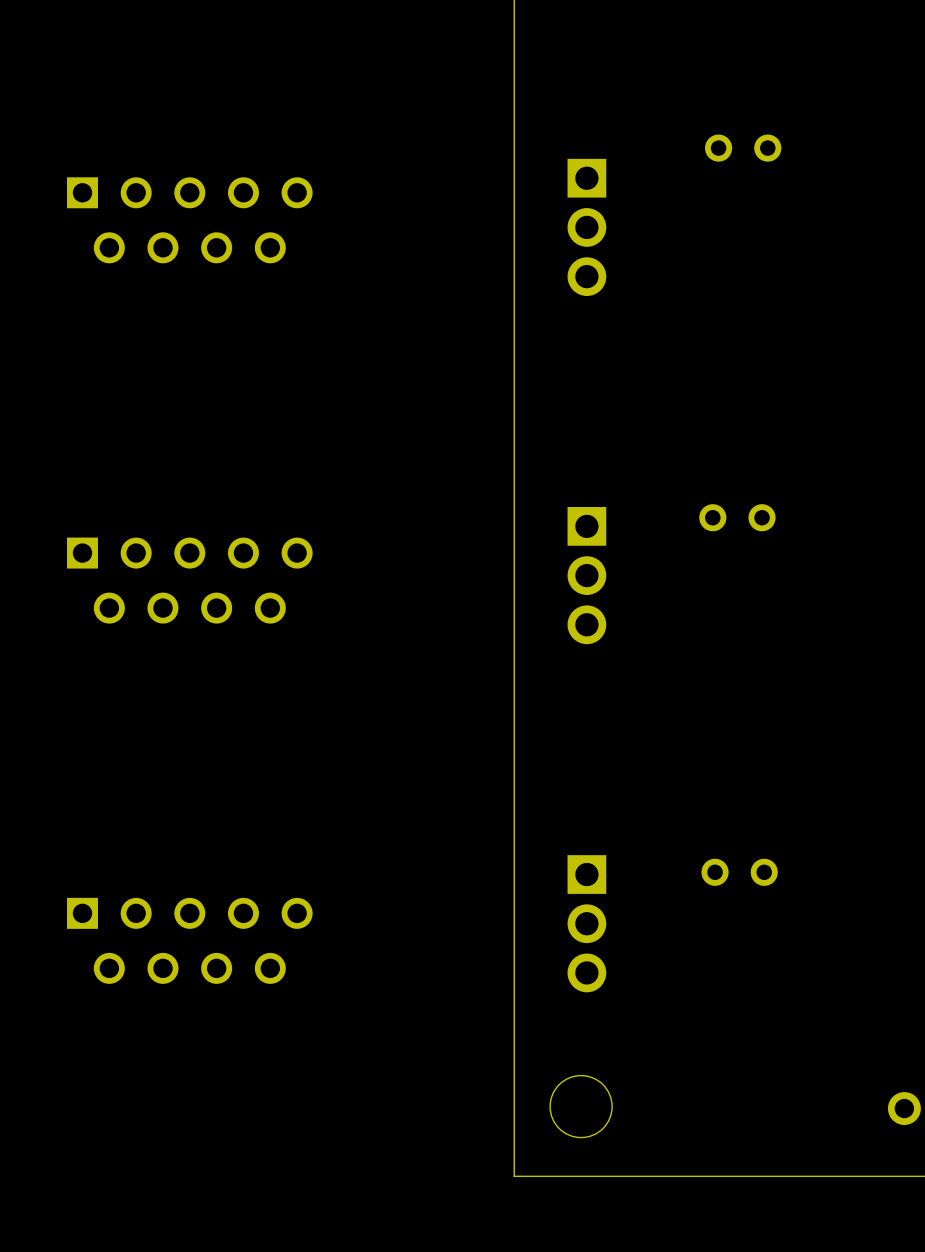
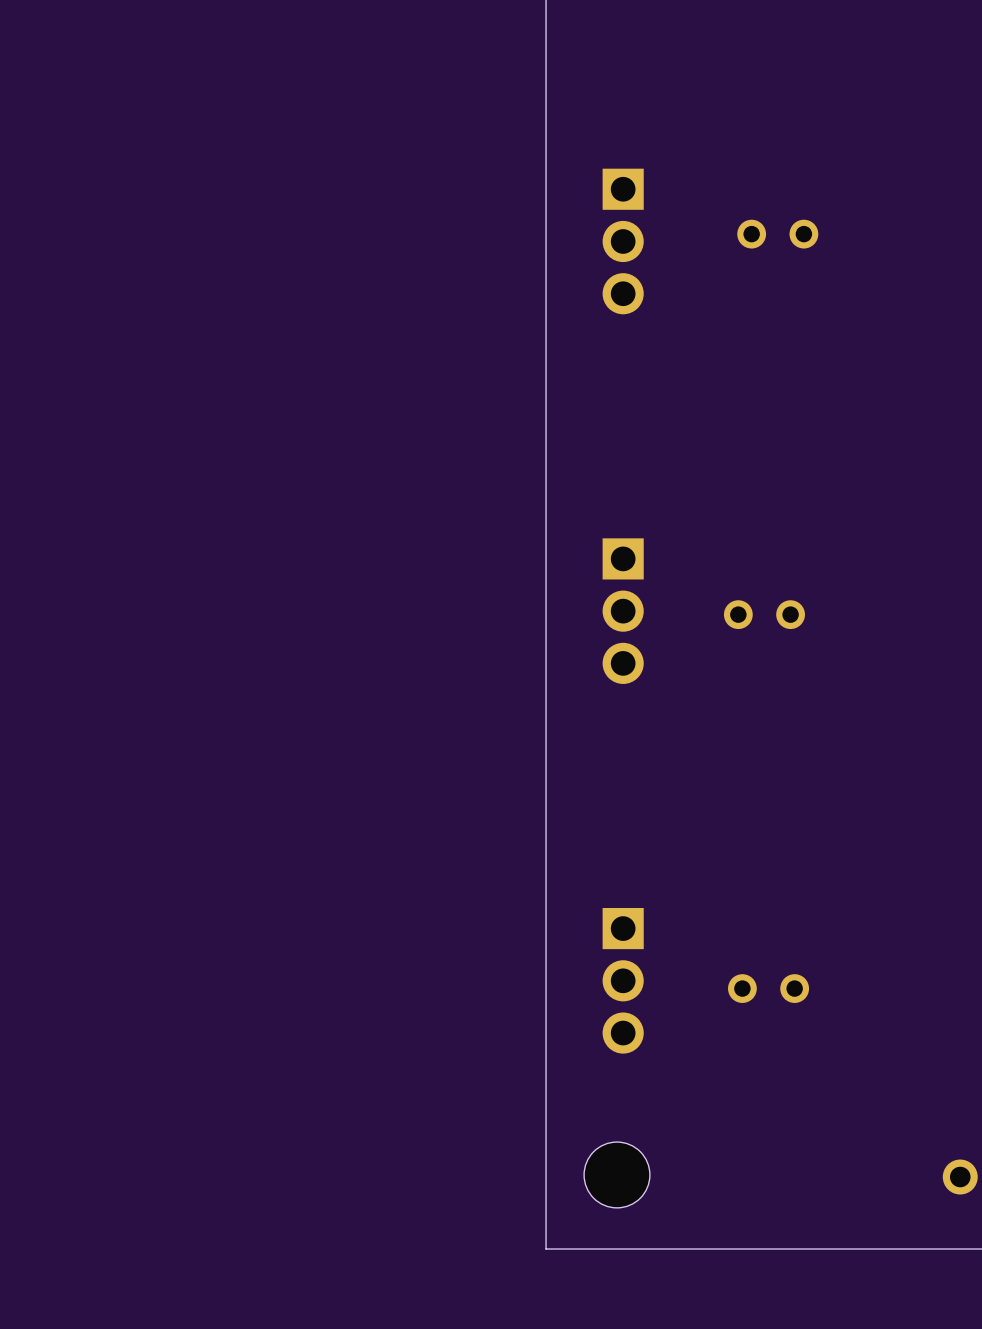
part position: (743, 148) -> (777, 234)
part: (189, 220) -> none
part position: (737, 517) -> (764, 614)
part: (189, 580) -> none
part position: (739, 872) -> (768, 988)
part: (189, 940) -> none

